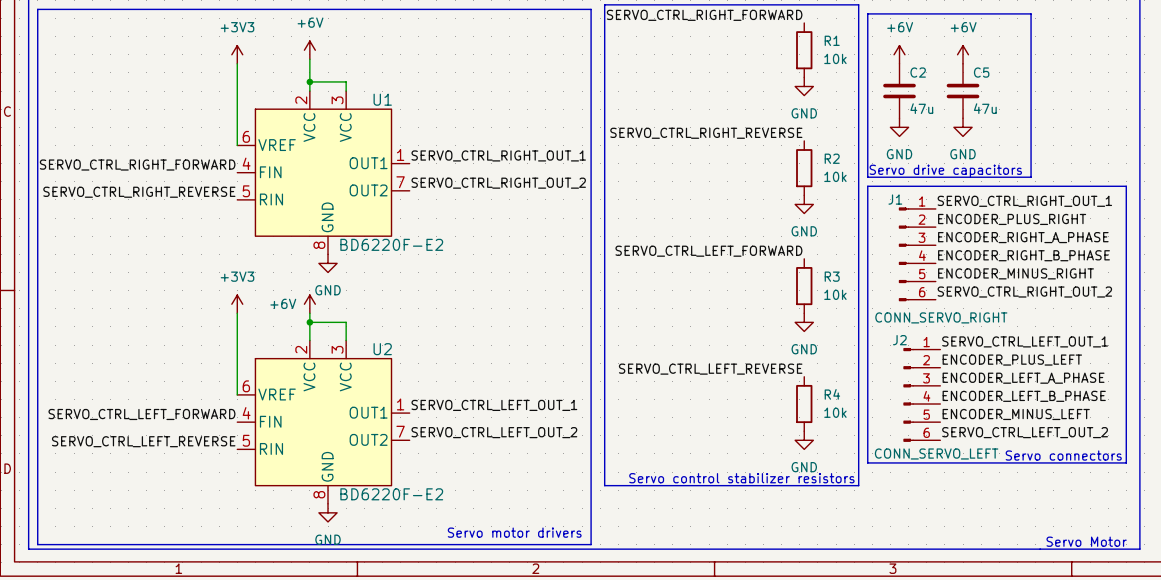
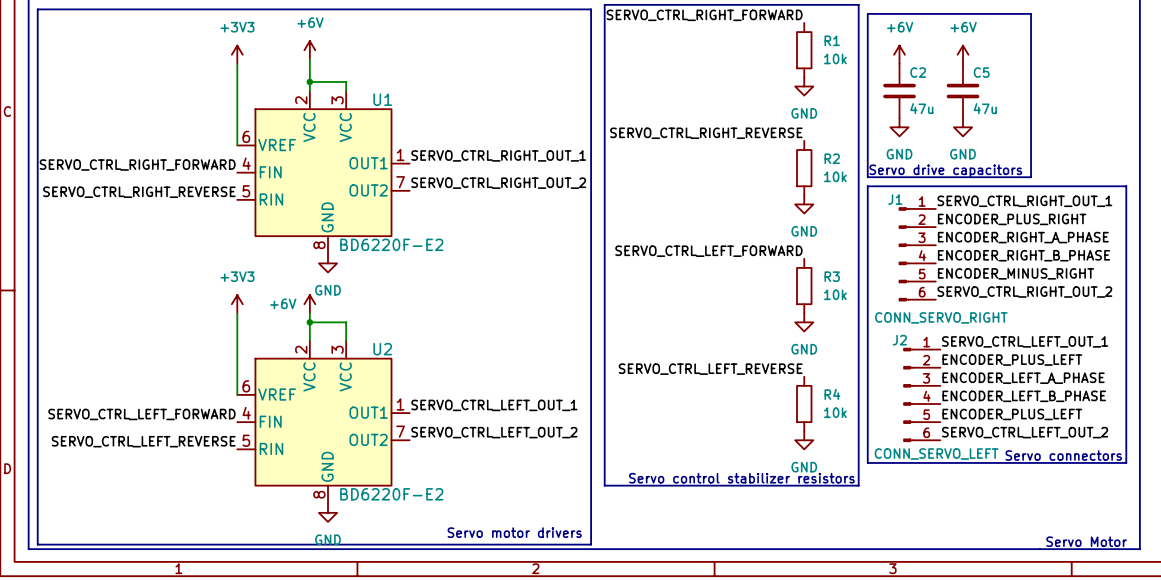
label: ENCODER_MINUS_LEFT (1016, 414) -> ENCODER_PLUS_LEFT (1012, 414)

